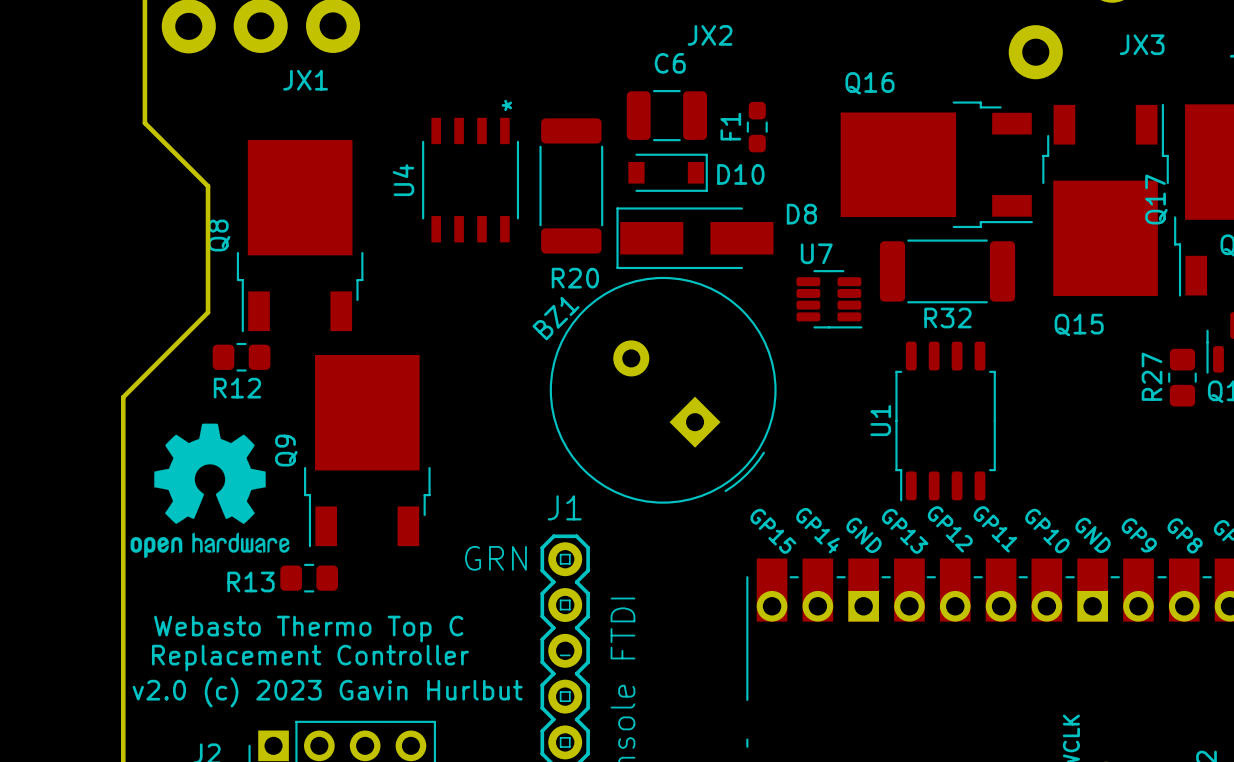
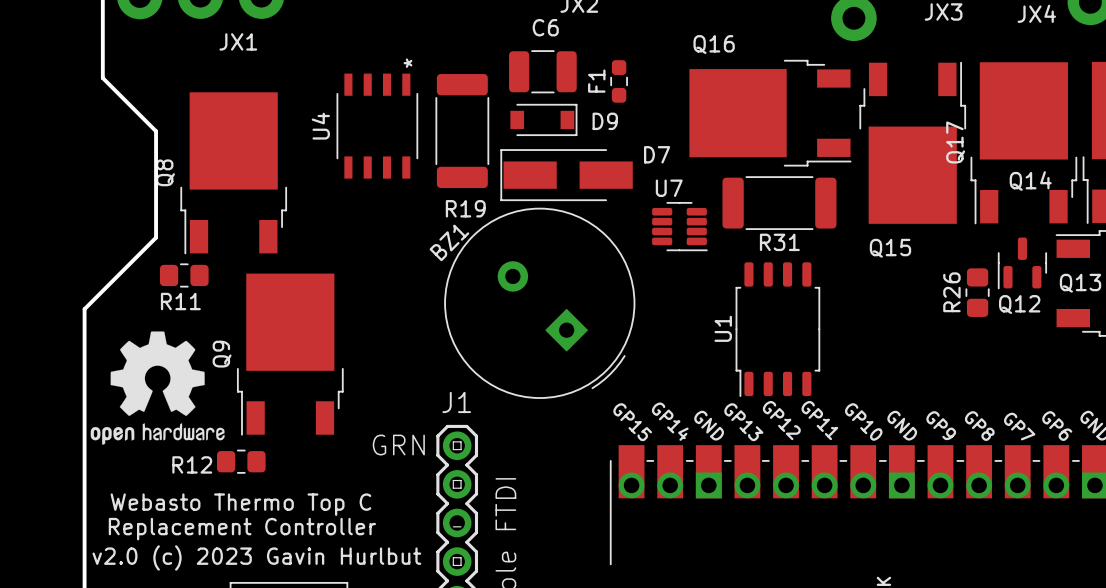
D10 name: D10 (740, 174) -> D9 (605, 121)
D8 name: D8 (801, 214) -> D7 (657, 154)
R20 name: R20 (575, 278) -> R19 (465, 208)
R32 name: R32 (947, 317) -> R31 (779, 242)
R27 name: R27 (1152, 376) -> R26 (951, 292)
R12 name: R12 (237, 388) -> R11 (180, 301)
R13 name: R13 (250, 581) -> R12 (192, 464)

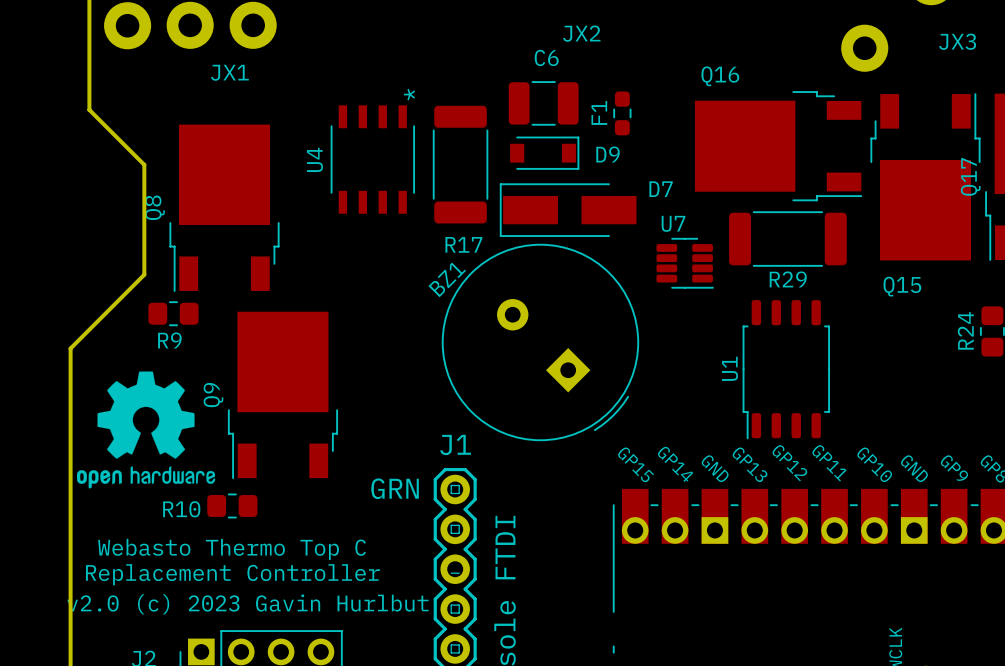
R19 name: R19 (465, 208) -> R17 (463, 244)
R31 name: R31 (779, 242) -> R29 (788, 279)
R26 name: R26 (951, 292) -> R24 (965, 330)
R11 name: R11 (180, 301) -> R9 (169, 340)
R12 name: R12 (192, 464) -> R10 (181, 509)

